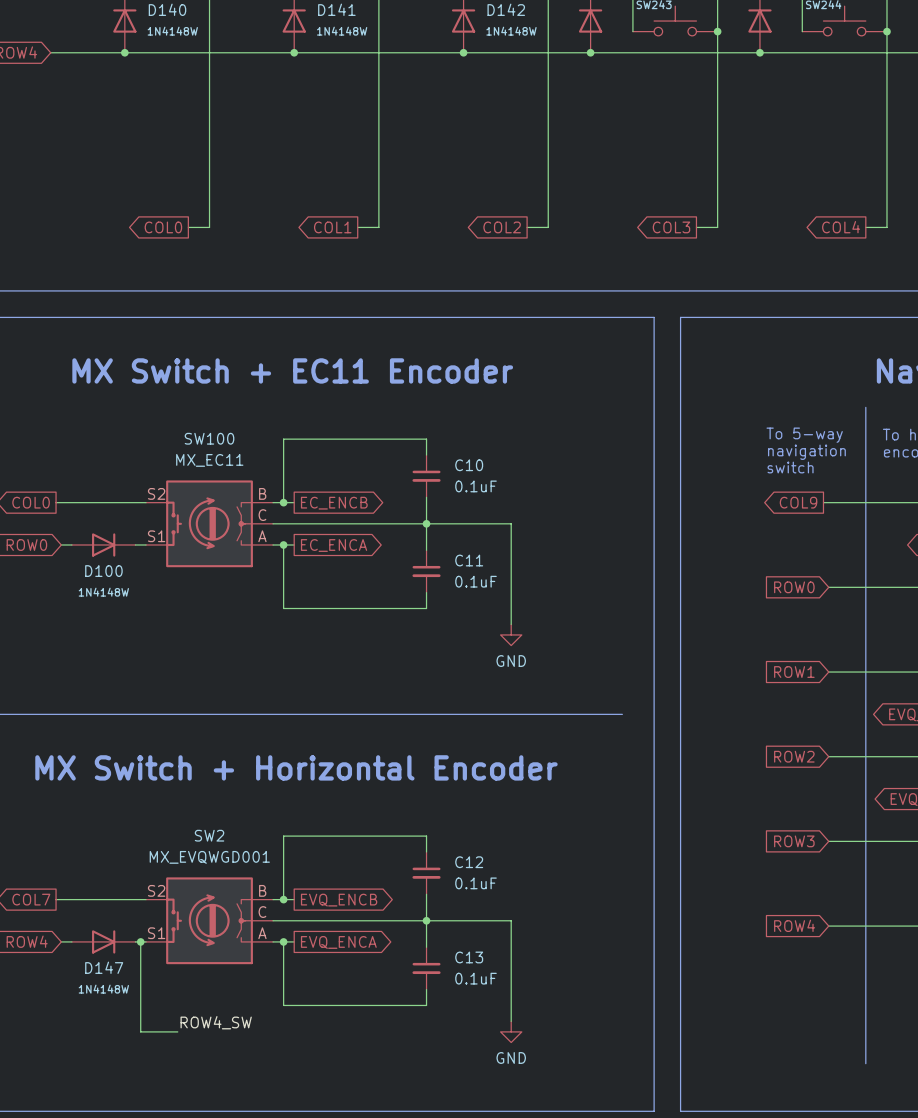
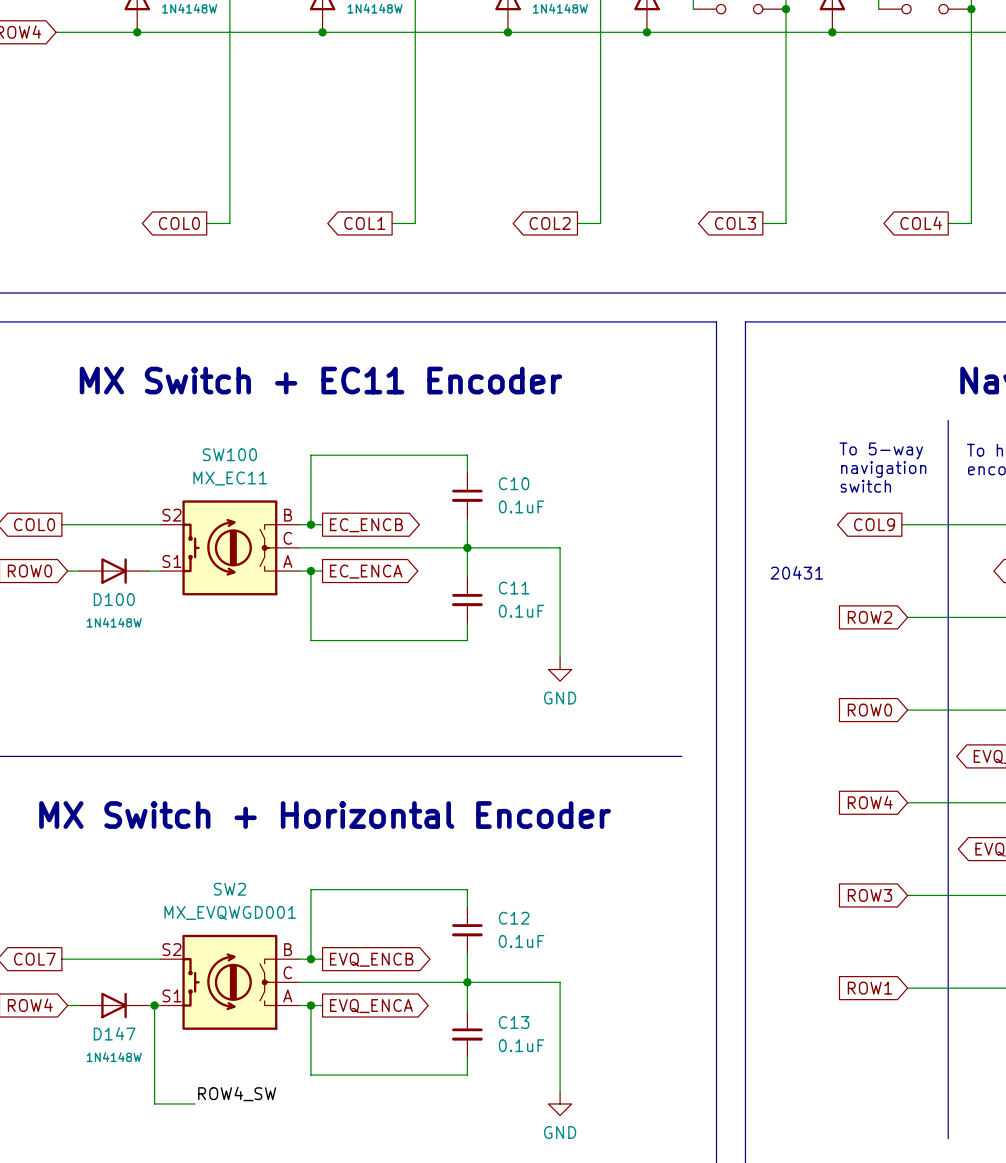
text: none -> 20431 (796, 572)
global label: ROW0 (794, 587) -> ROW2 (869, 617)
global label: ROW1 (794, 672) -> ROW0 (869, 710)
global label: ROW2 (794, 756) -> ROW4 (870, 802)
global label: ROW4 (794, 925) -> ROW1 (869, 988)

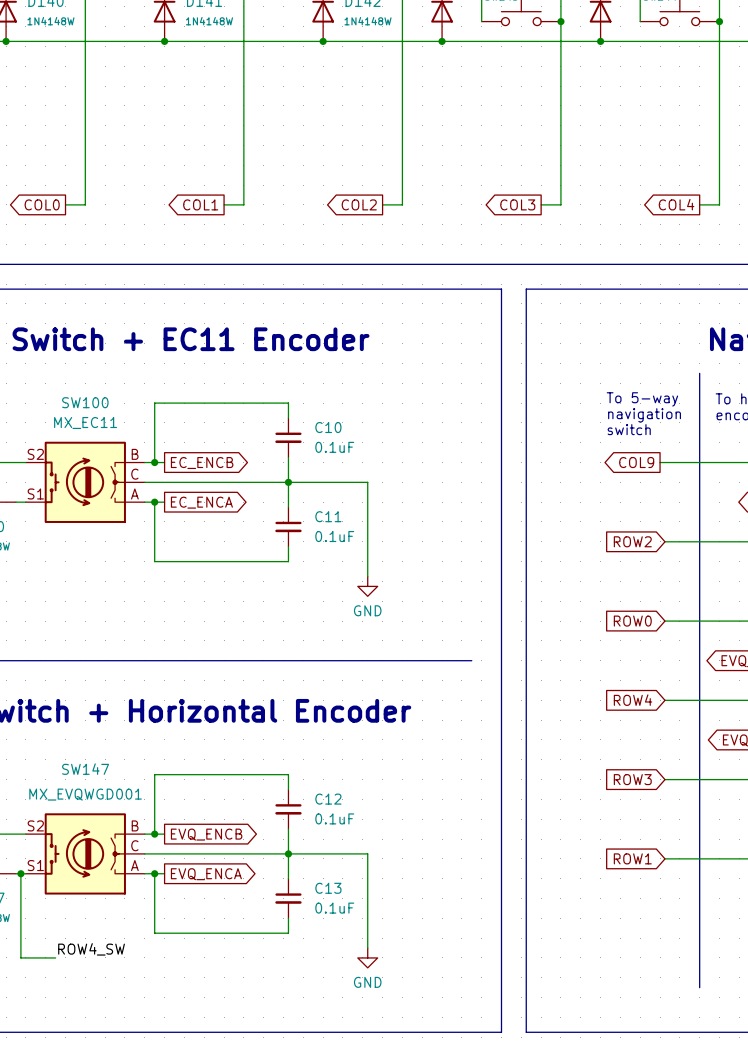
text: 20431 (796, 572) -> none
SW2 name: SW2 (229, 889) -> SW147 (85, 769)

